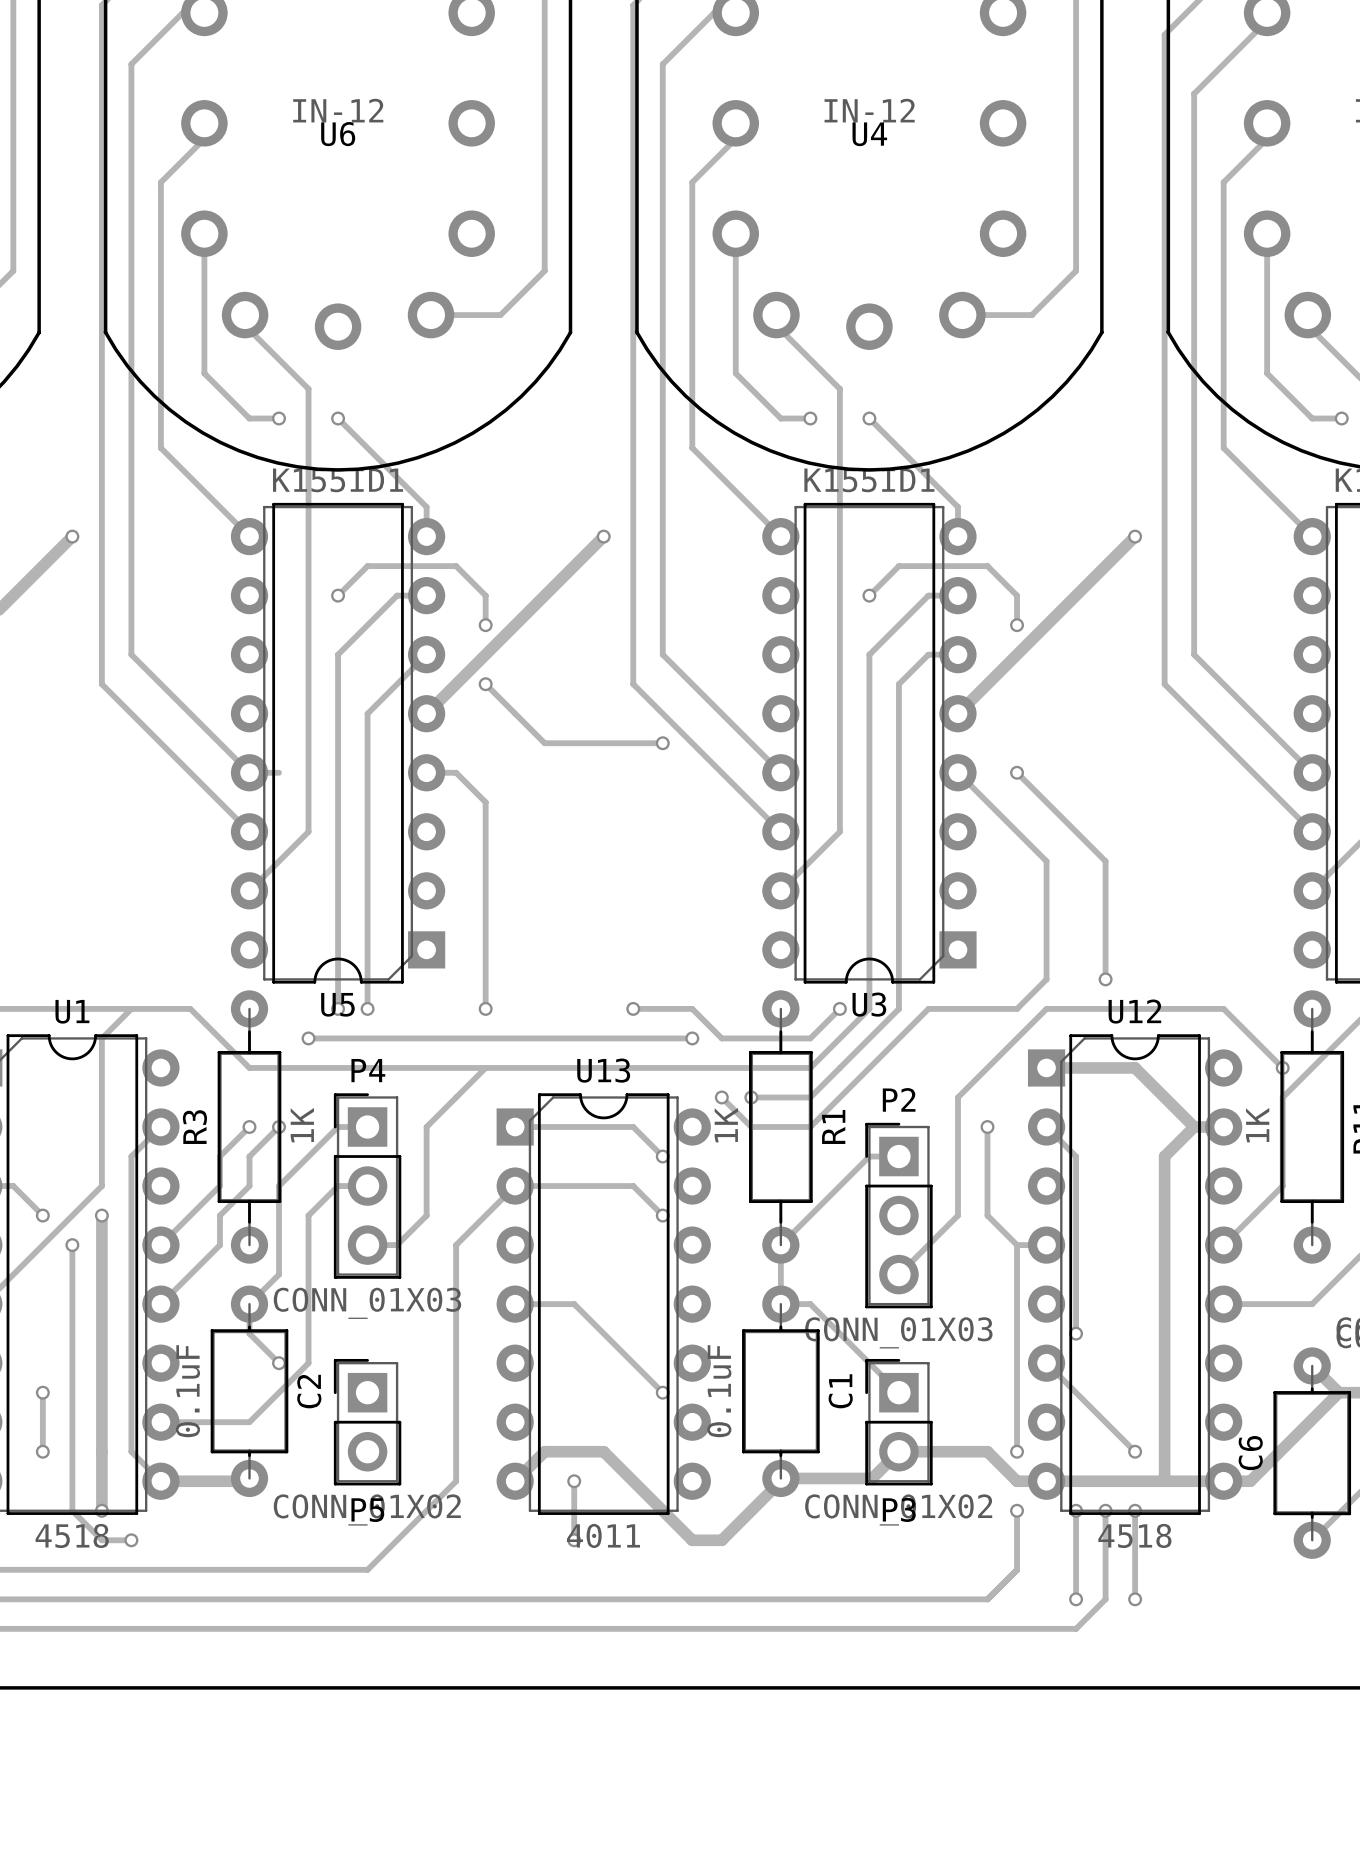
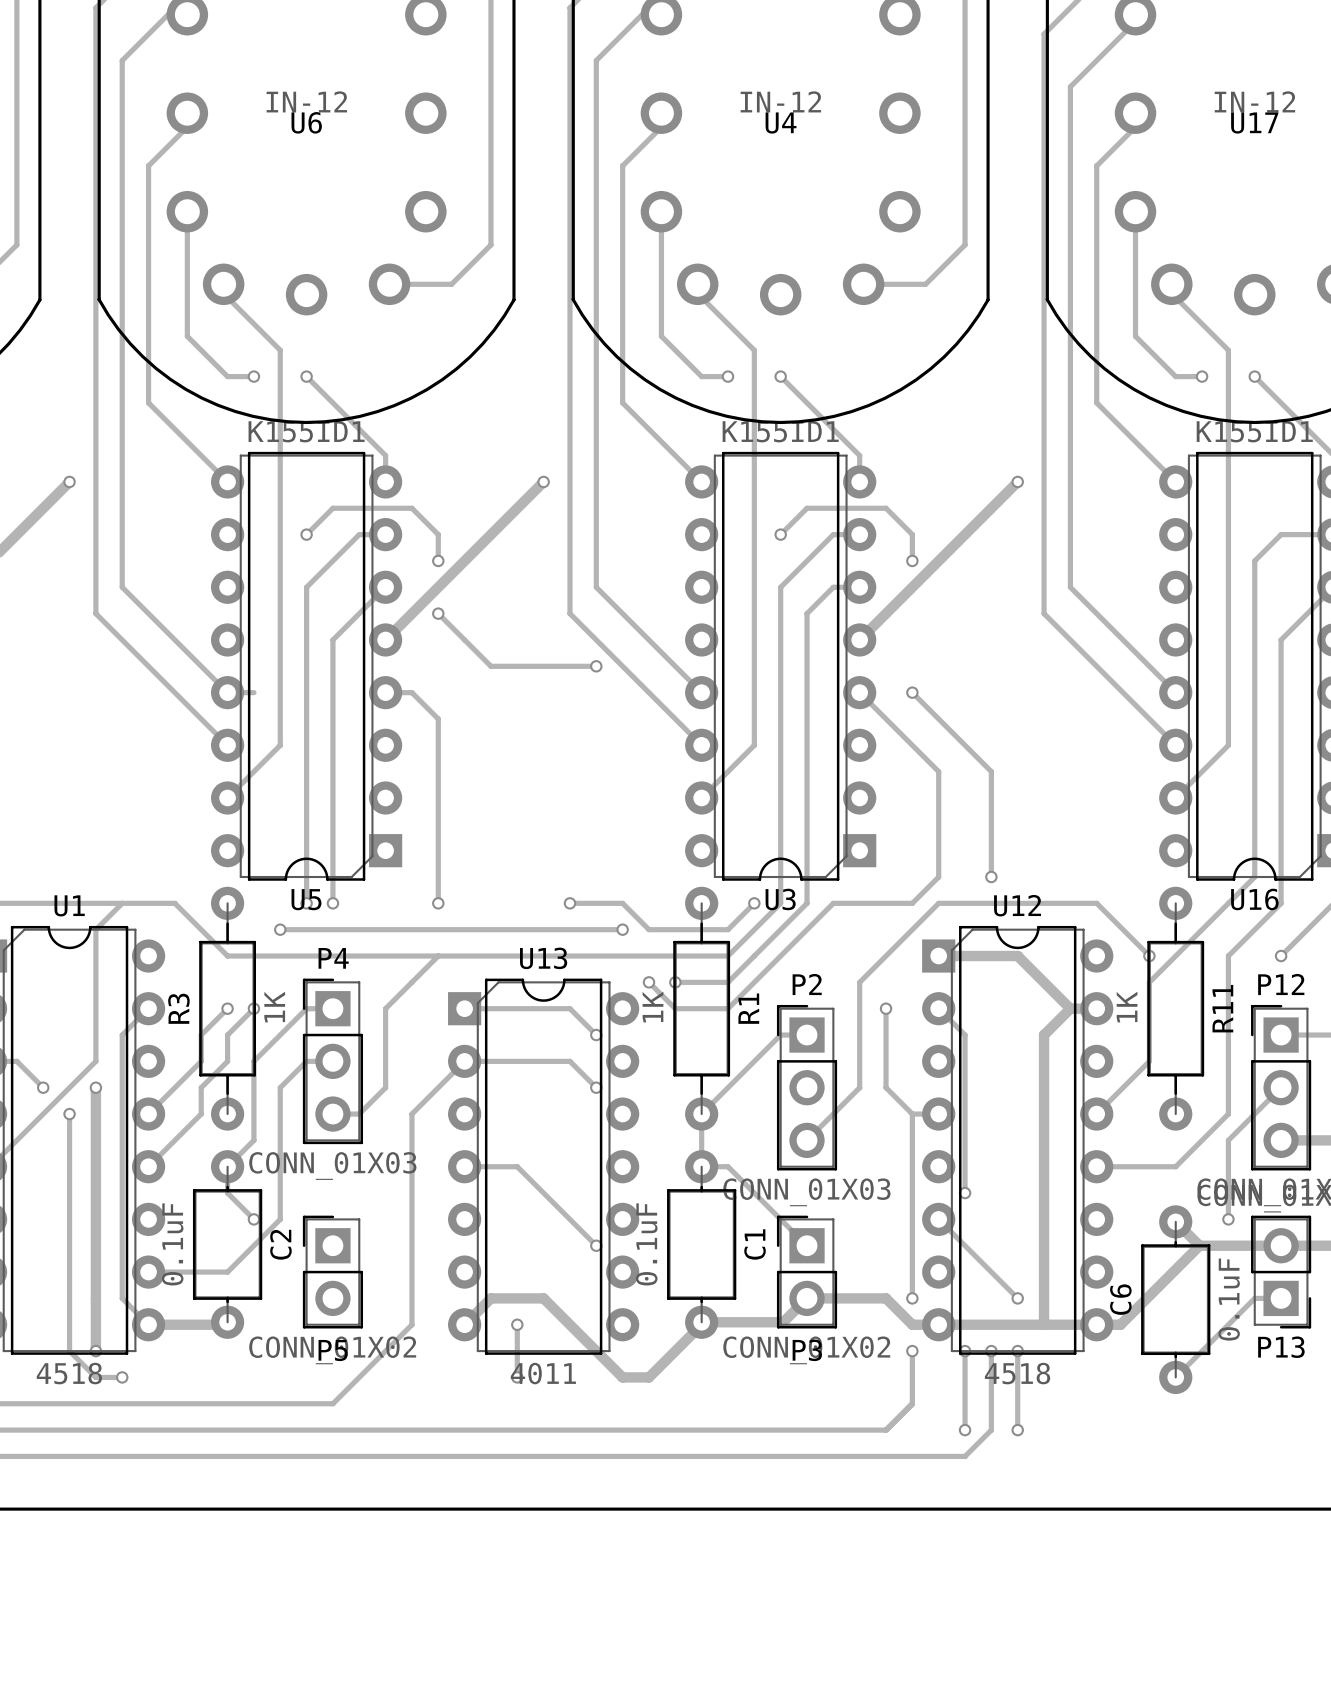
track: (42, 1392) (42, 1451) -> none
via: (42, 1392) -> none
via: (42, 1451) -> none

